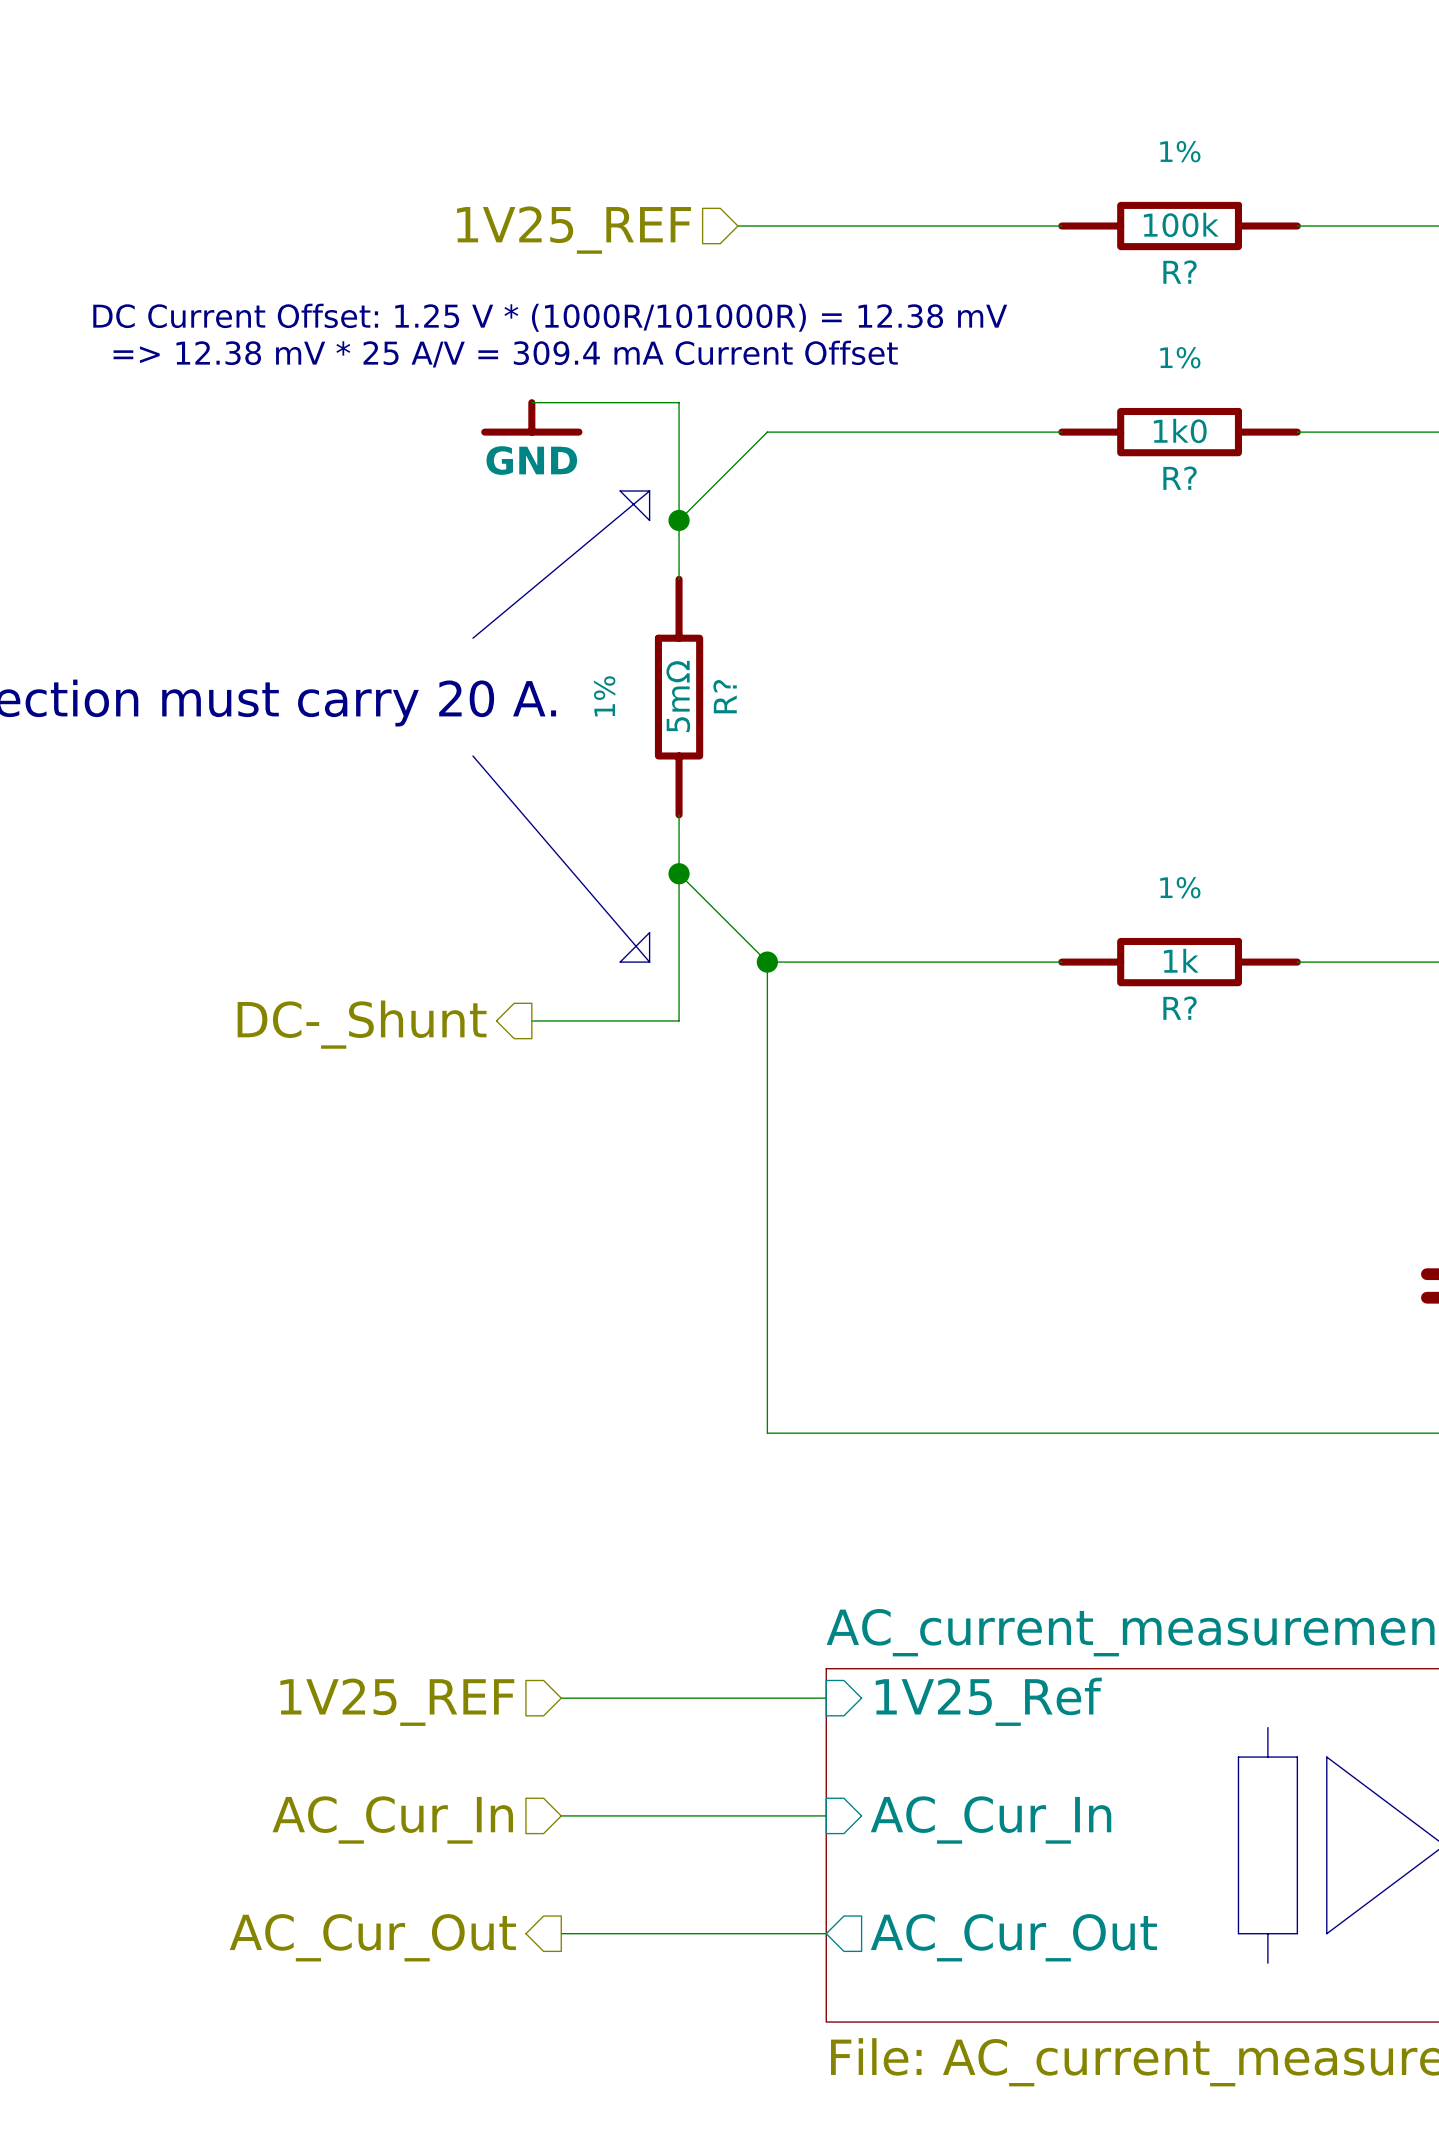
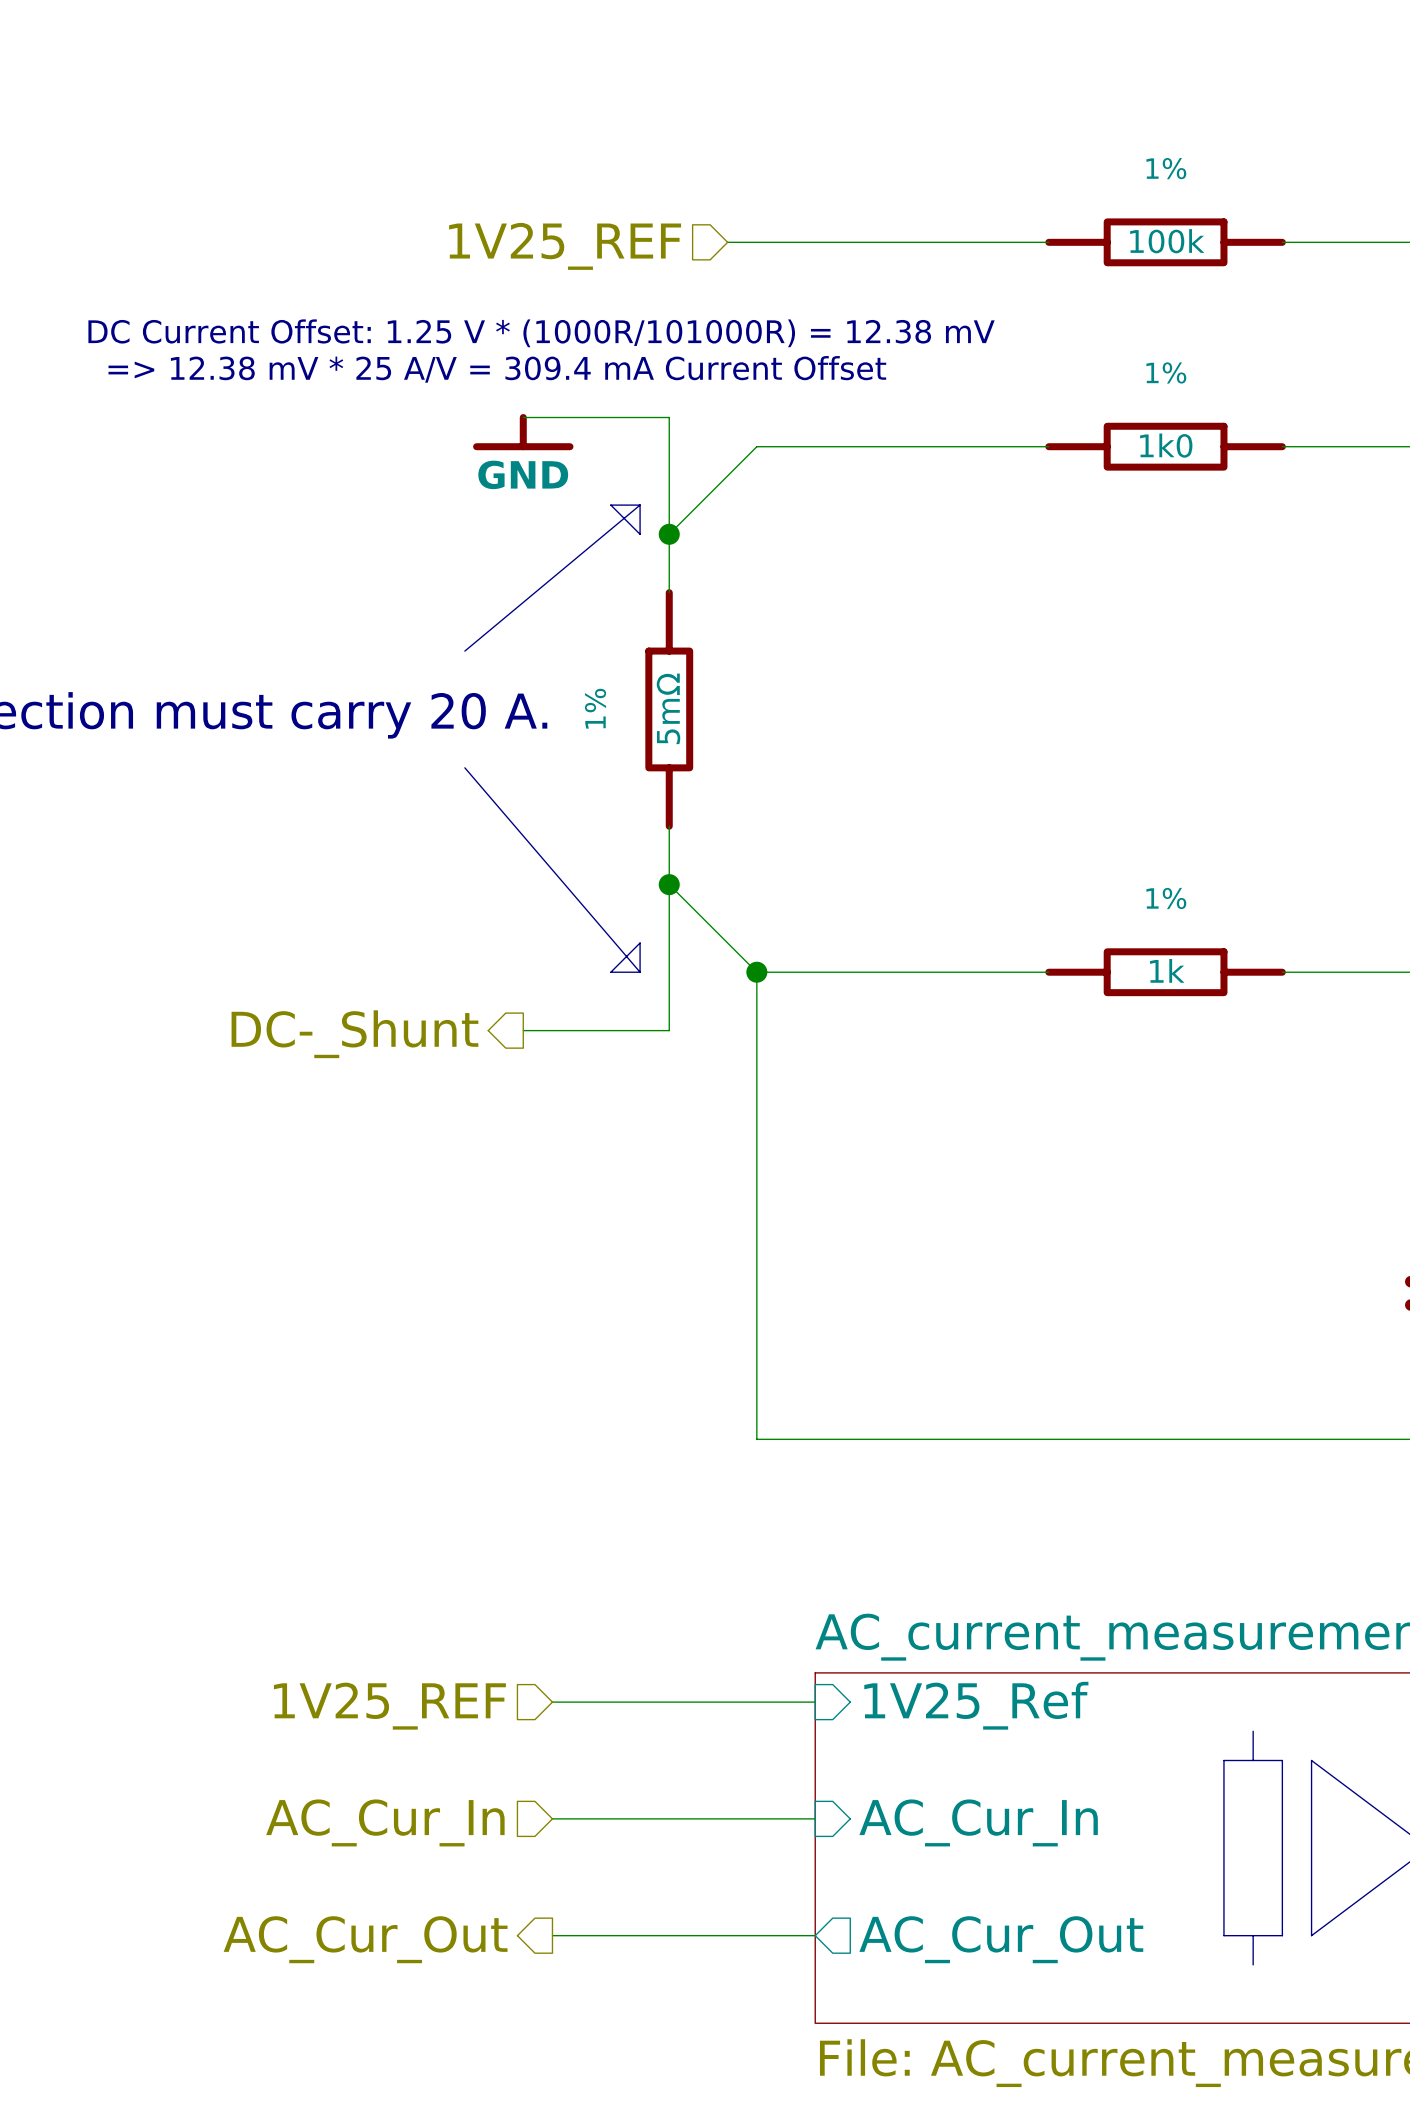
R? name: R? (1180, 272) -> none
R? name: R? (1180, 478) -> none
R? name: R? (725, 696) -> none
R? name: R? (1180, 1008) -> none

